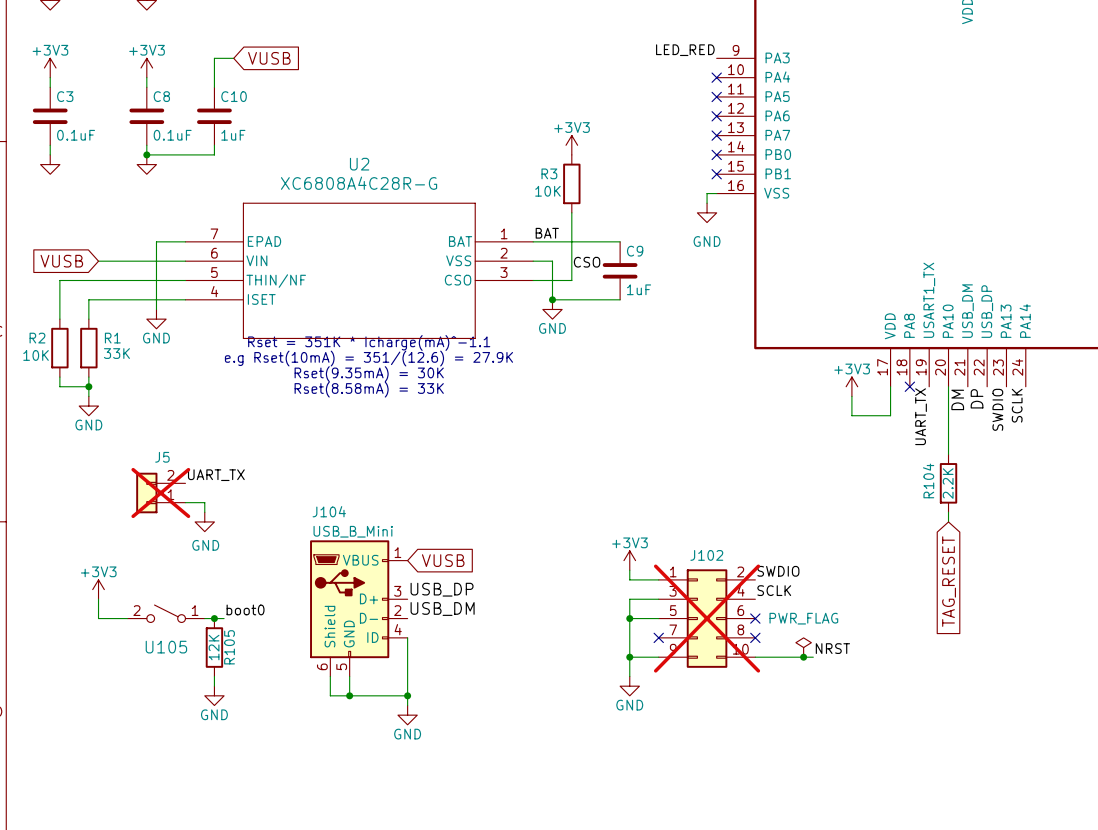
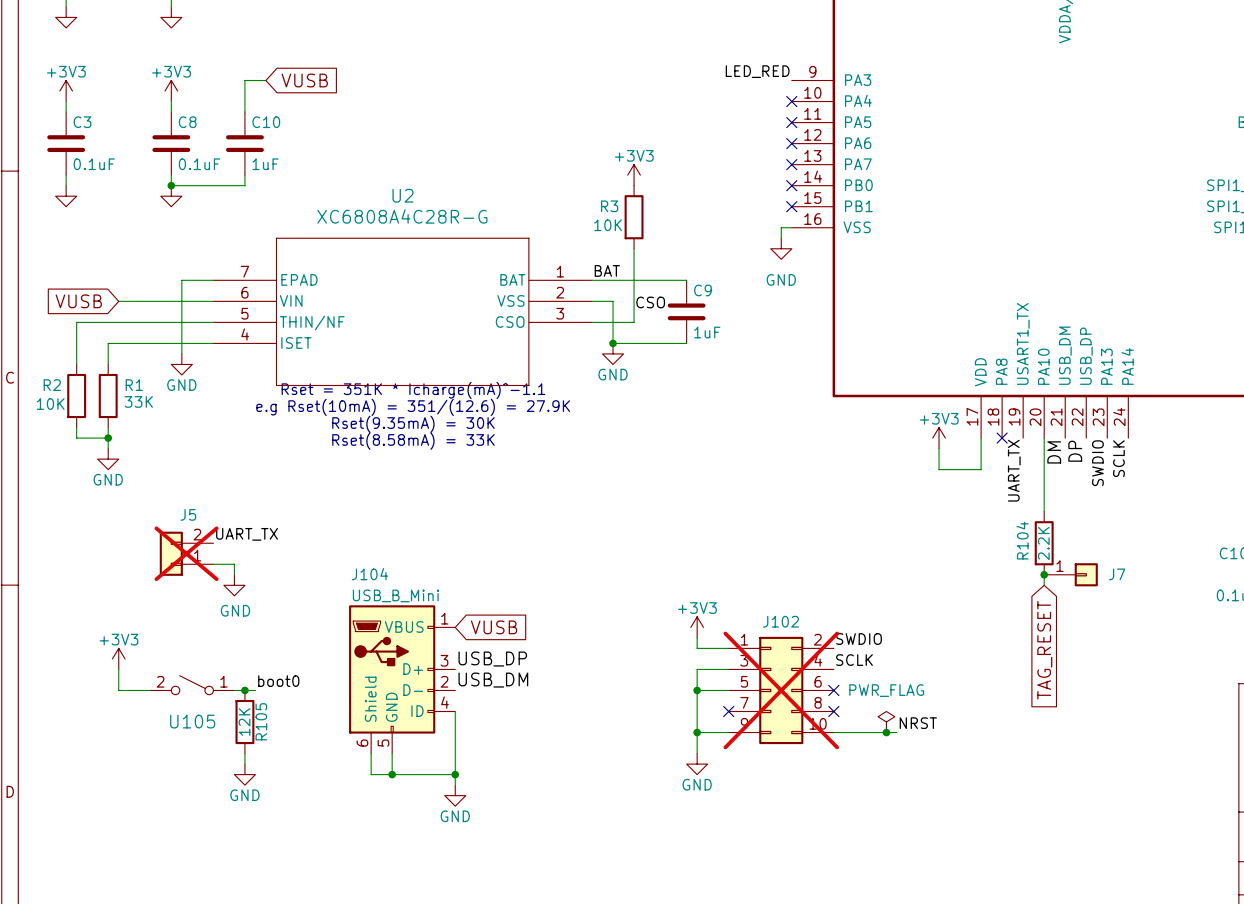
junction: none -> (1044, 574)
J7: none -> (1071, 574)

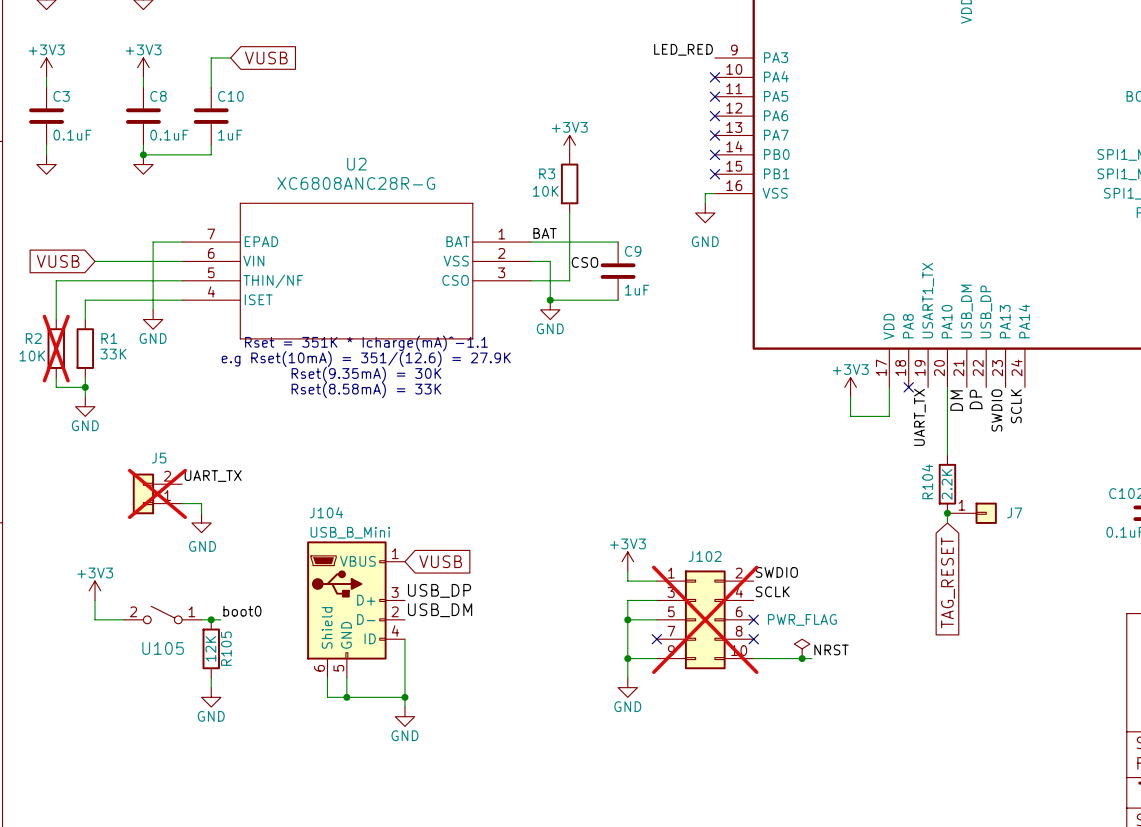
U2 value: XC6808A4C28R-G (402, 216) -> XC6808ANC28R-G (356, 183)
R2 do-not-place cross: none -> (56, 348)

